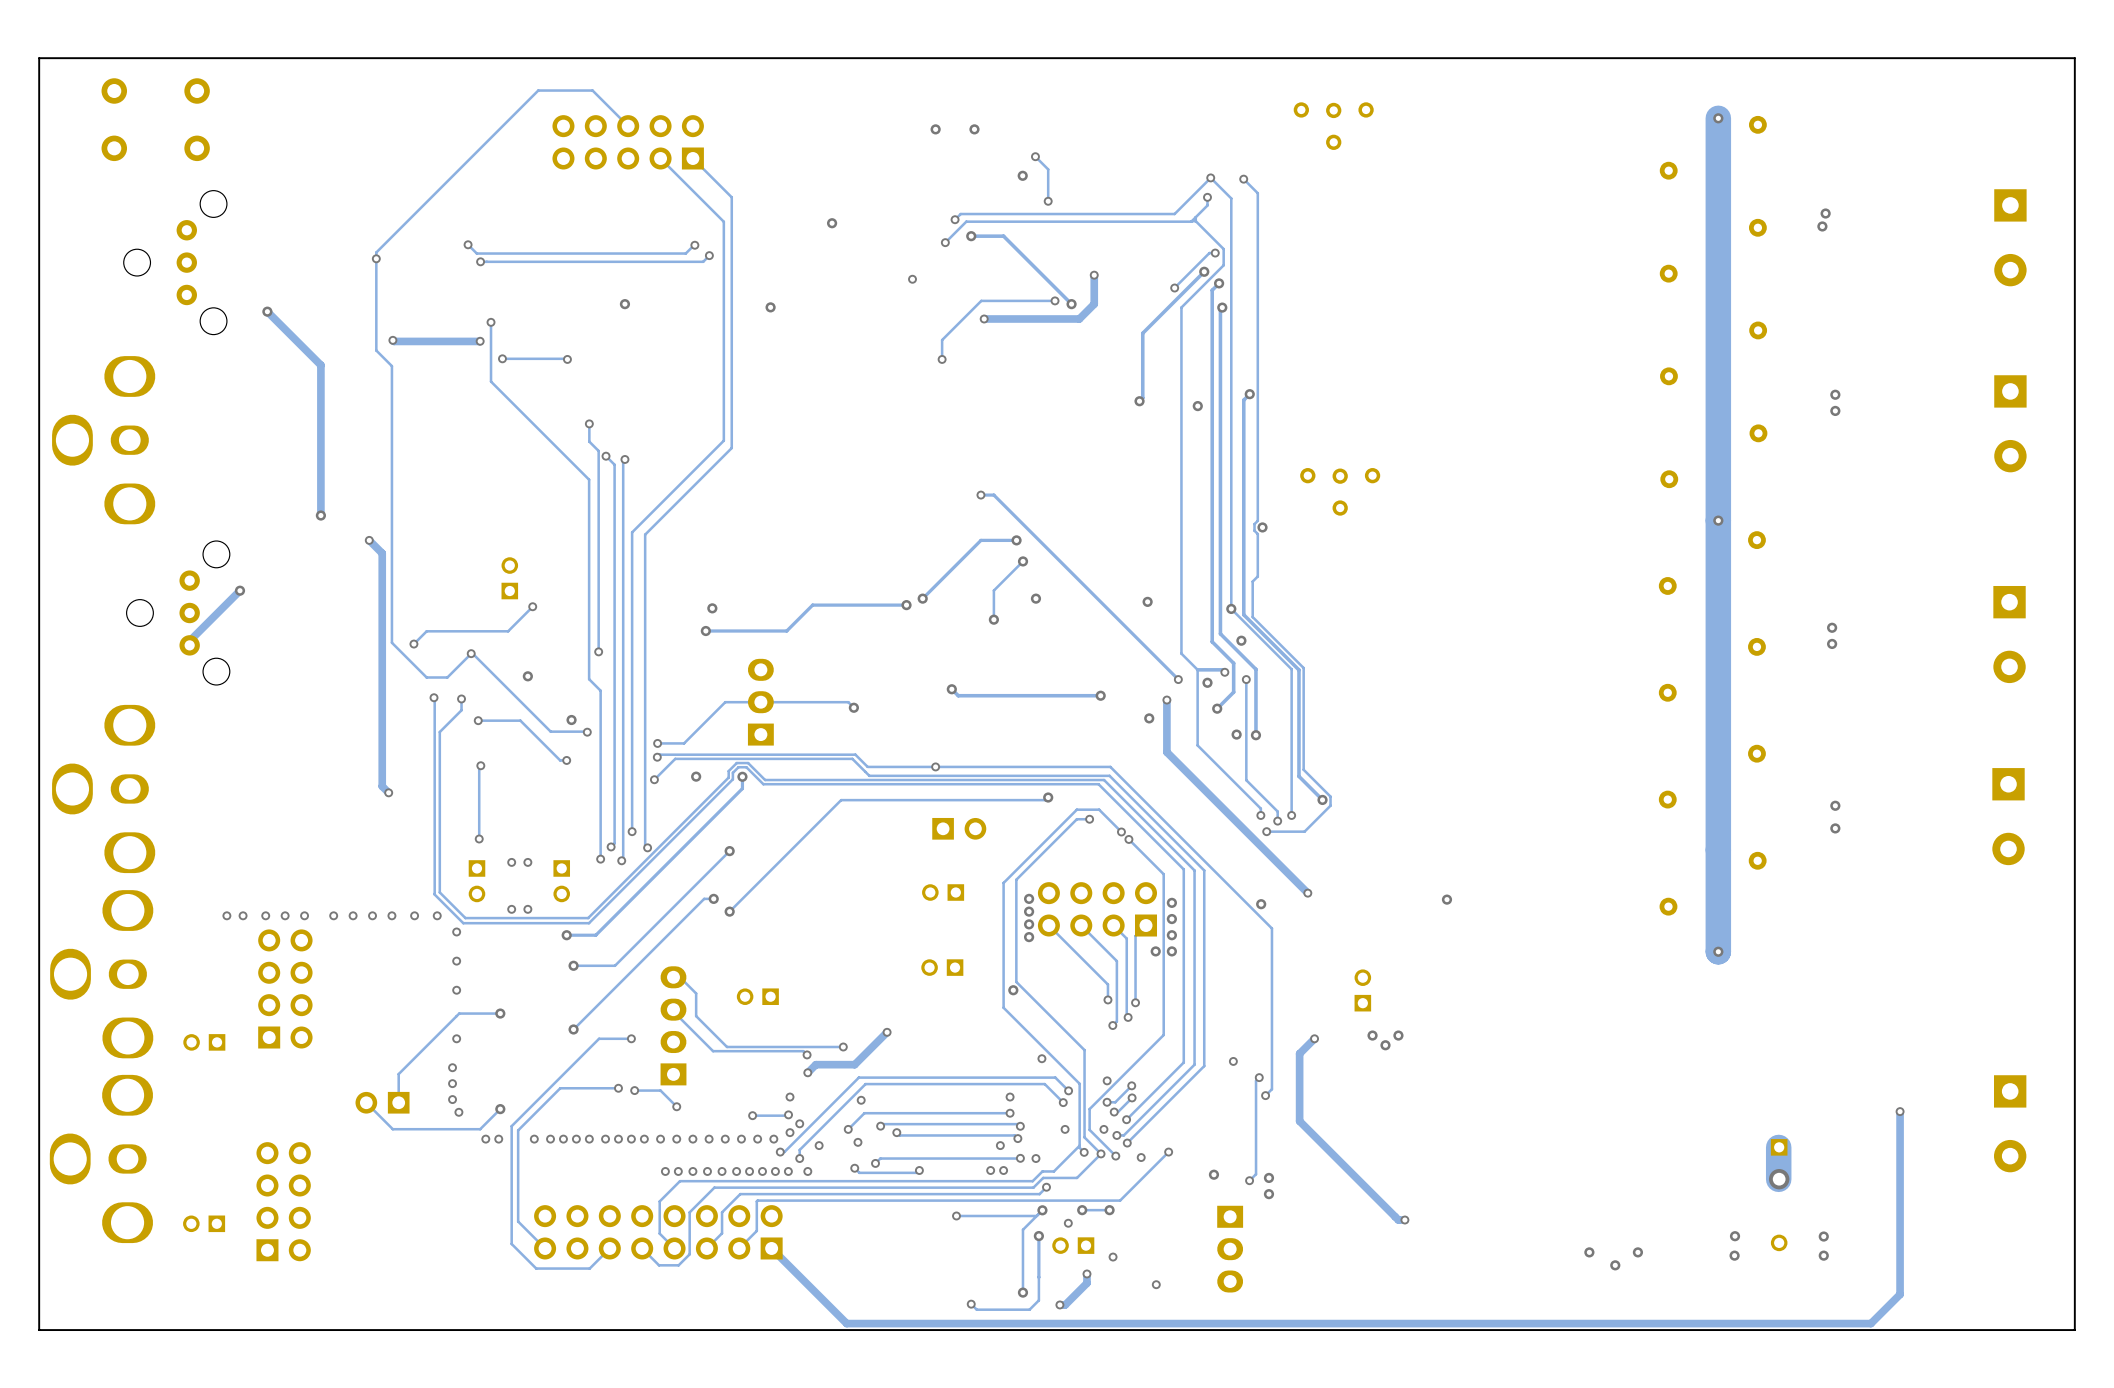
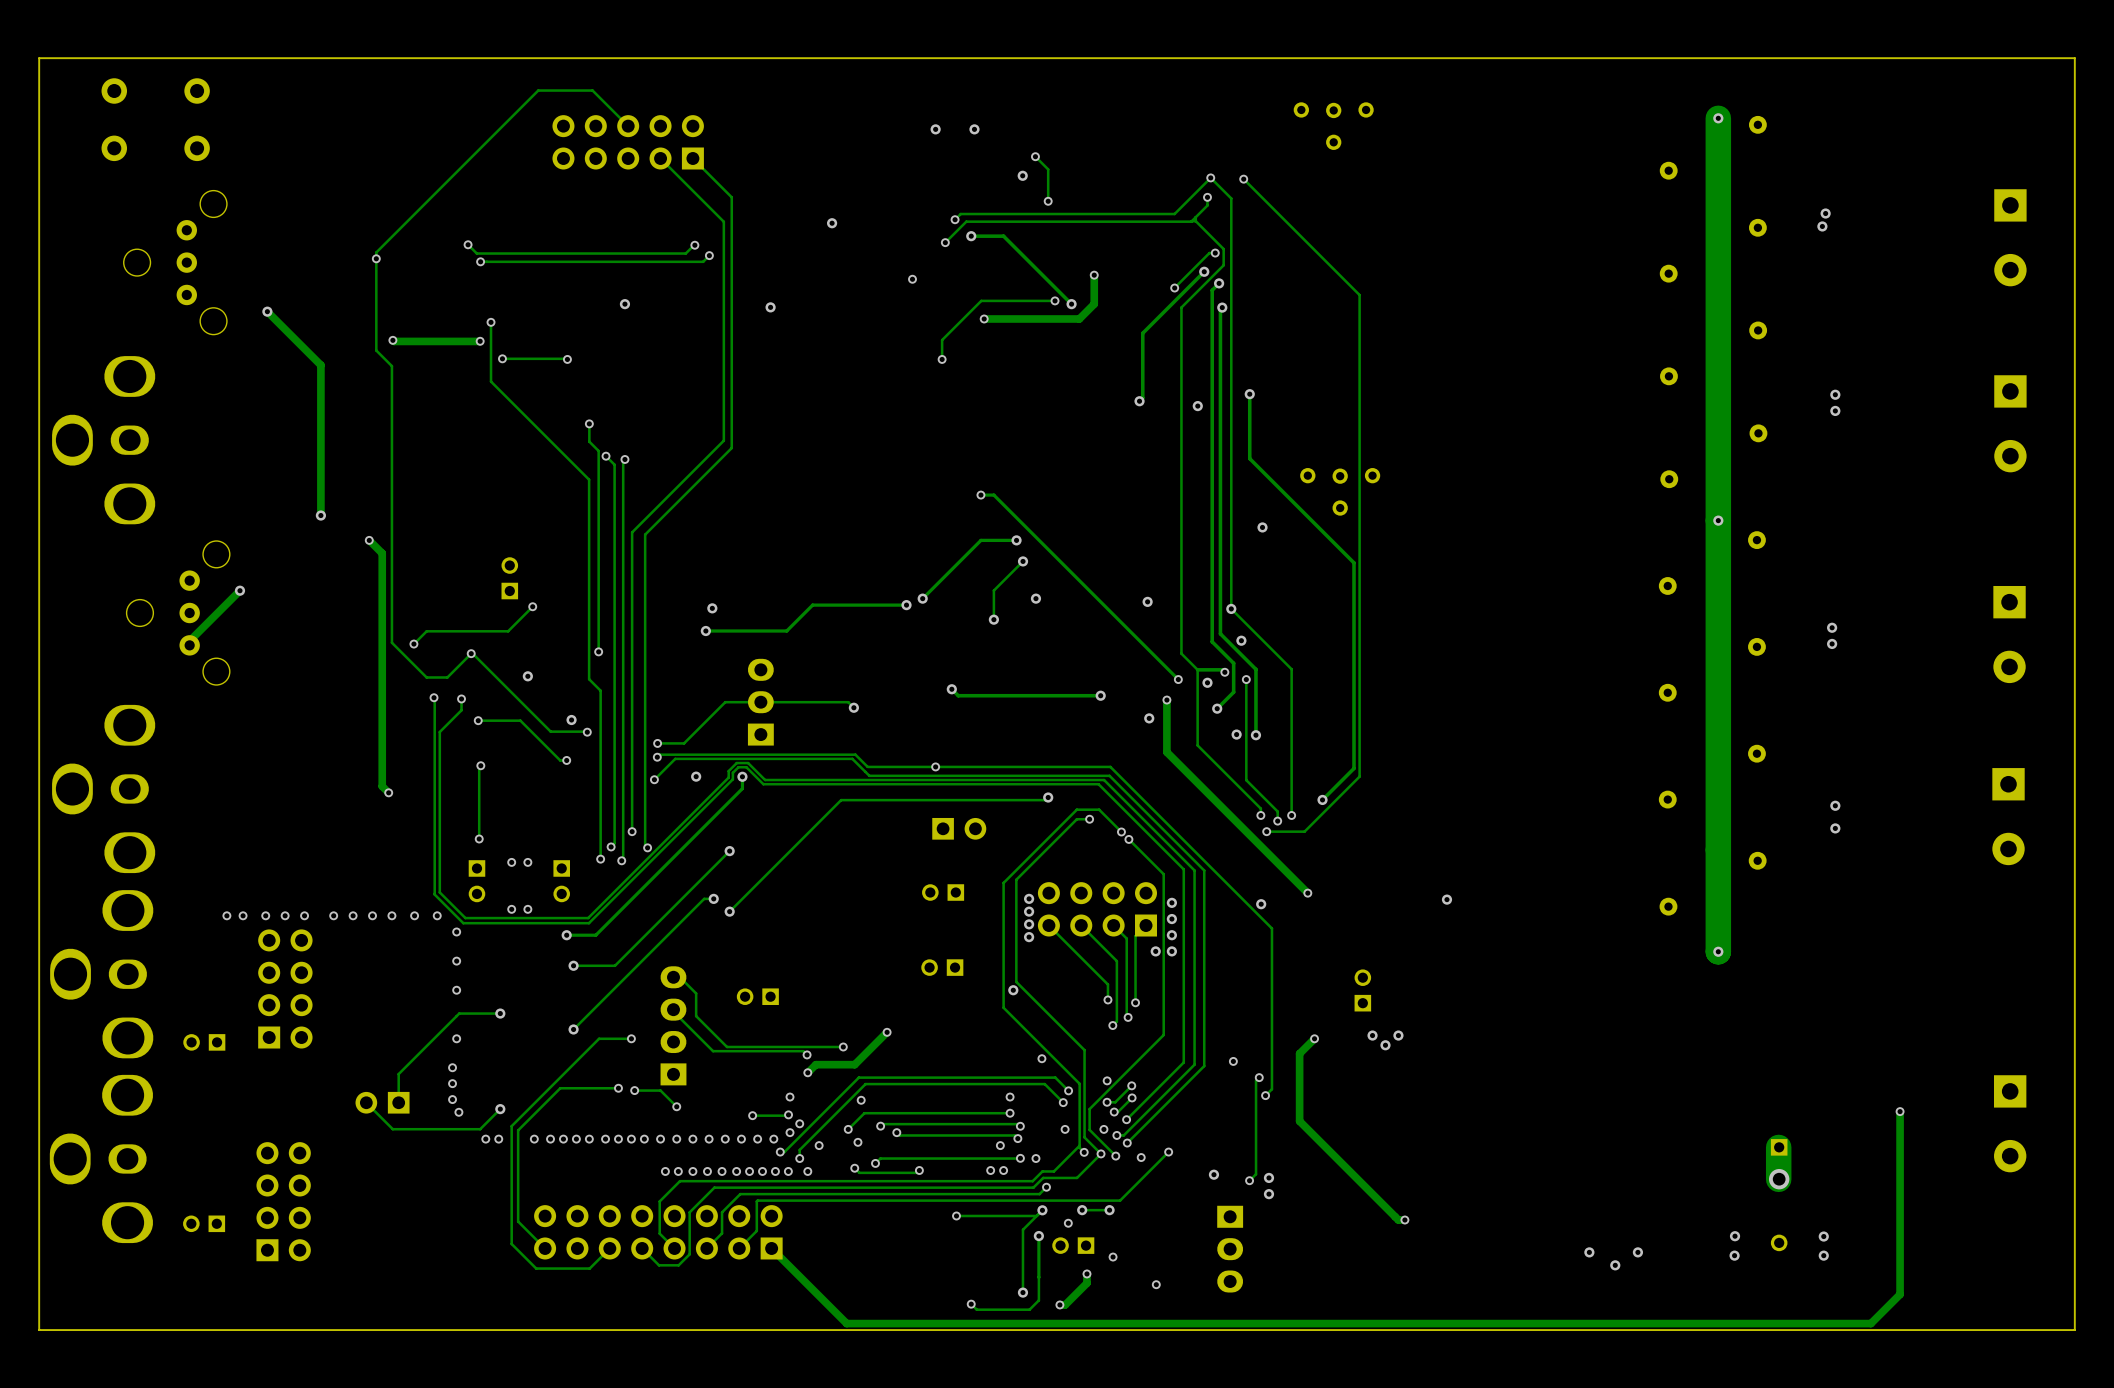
track: (1257, 193) (1257, 520) (1254, 524) (1254, 530) (1257, 534) (1257, 576) (1252, 581) (1252, 617) (1303, 668) (1303, 769) (1330, 796) (1330, 805) -> (1257, 193) (1359, 295) (1359, 776) (1330, 805)
track: (1249, 394) (1243, 400) (1243, 614) (1298, 669) (1298, 776) (1322, 799) -> (1249, 394) (1249, 458) (1353, 562) (1353, 768) (1322, 799)

